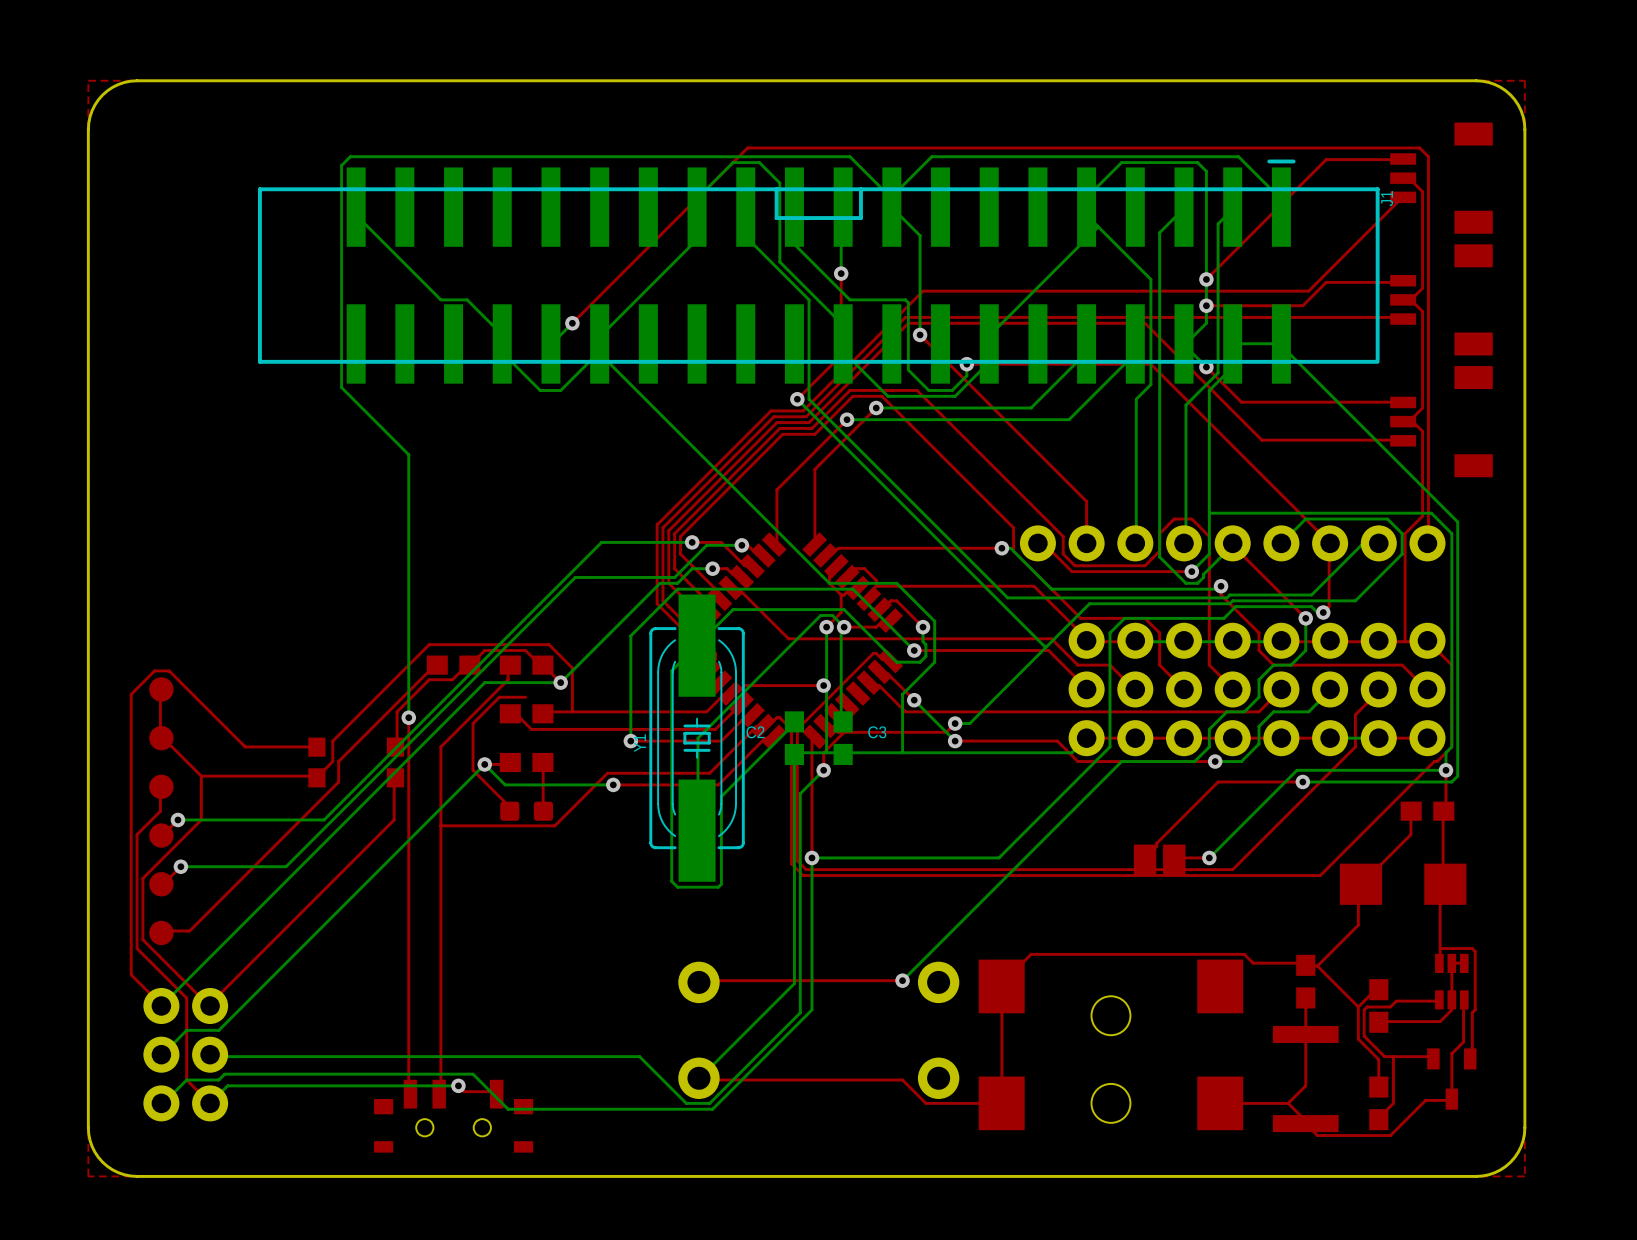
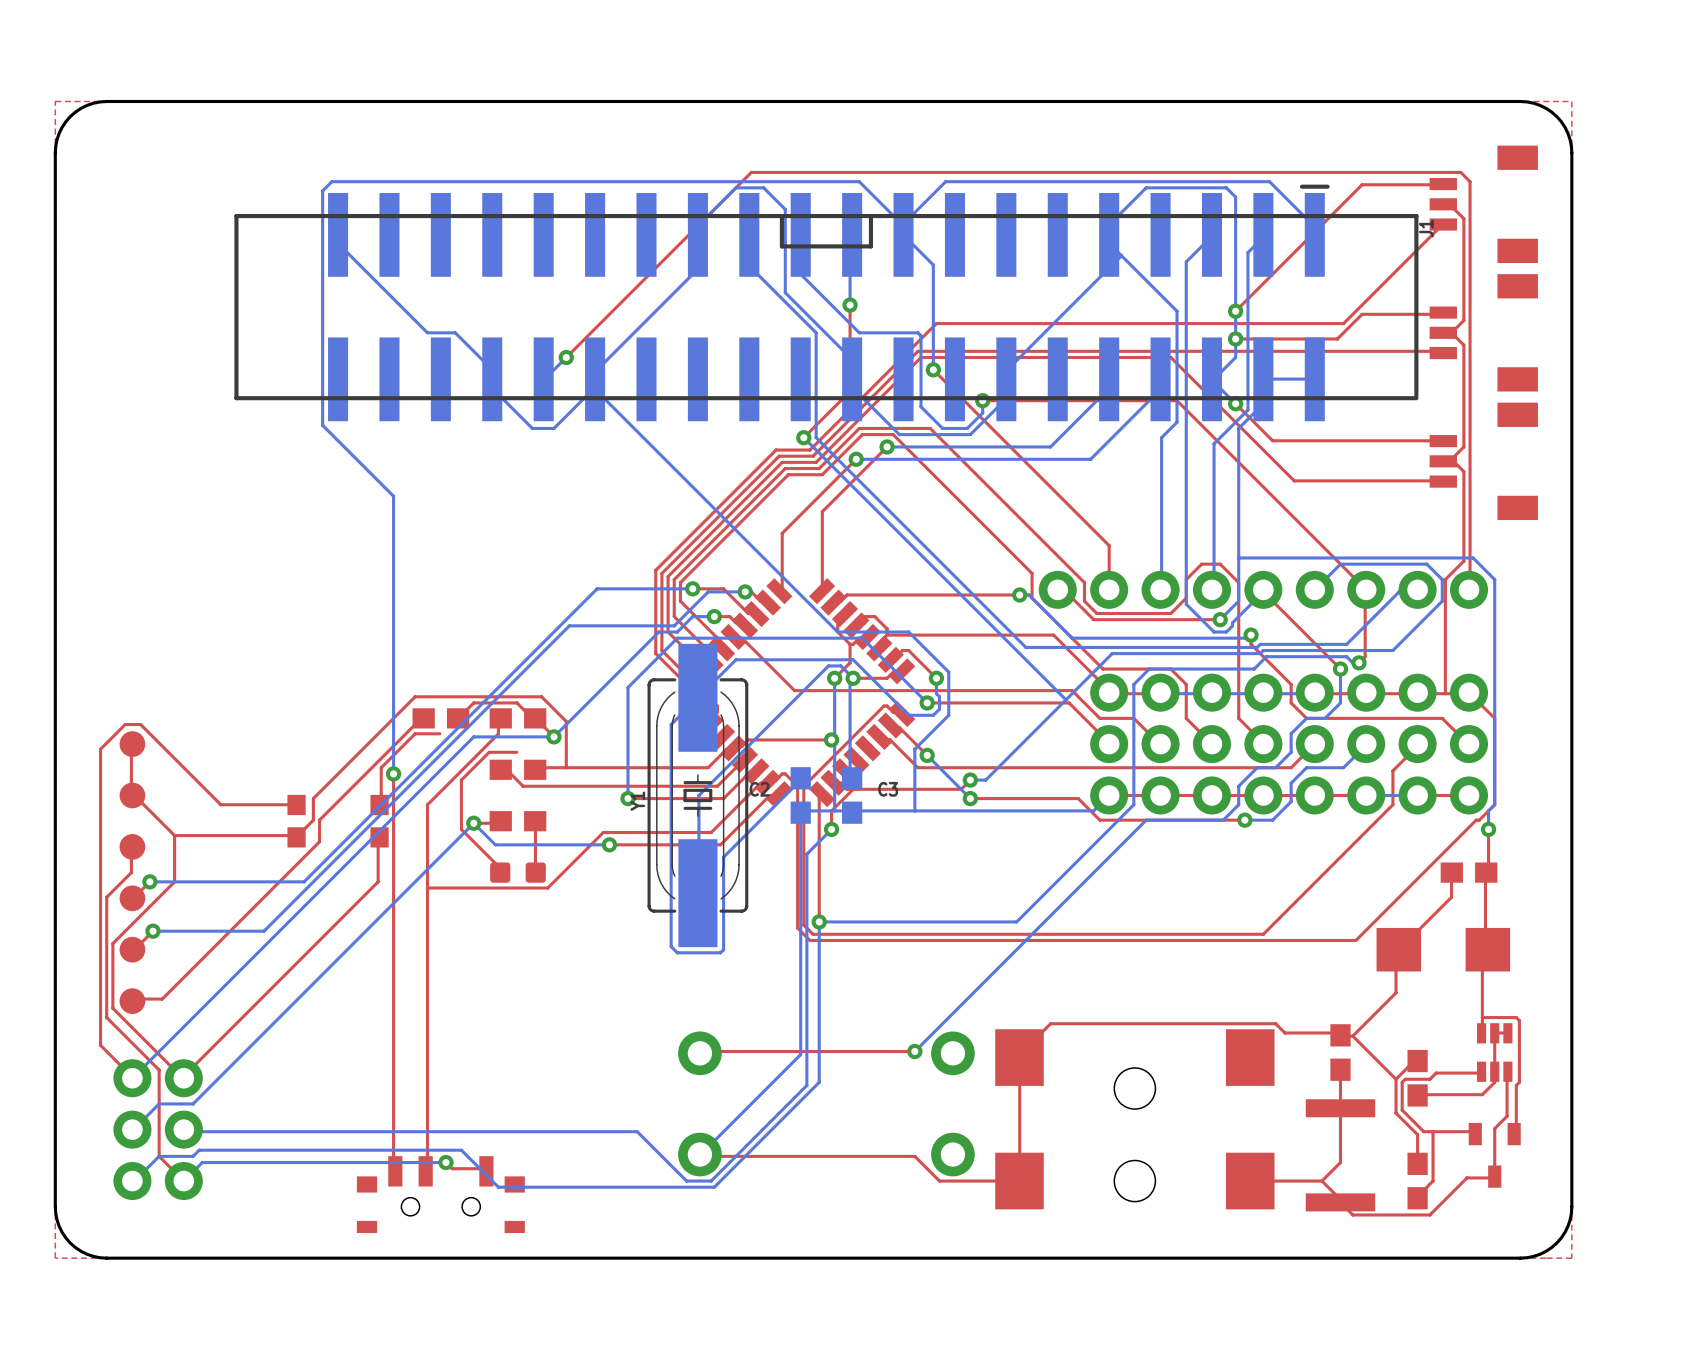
bottom track: (1281, 343) (1457, 521) (1457, 776) (1451, 781) (1302, 781) -> none
top track: (467, 665) (452, 679) -> none
bottom track: (1446, 770) (1296, 770) (1209, 857) -> none
top track: (1302, 781) (1218, 781) (1156, 843) (1156, 846) (1145, 859) -> none
via: (1302, 781) -> none
top track: (1209, 857) (1174, 857) (1174, 859) -> none
via: (1209, 857) -> none
part: (1159, 859) -> none

